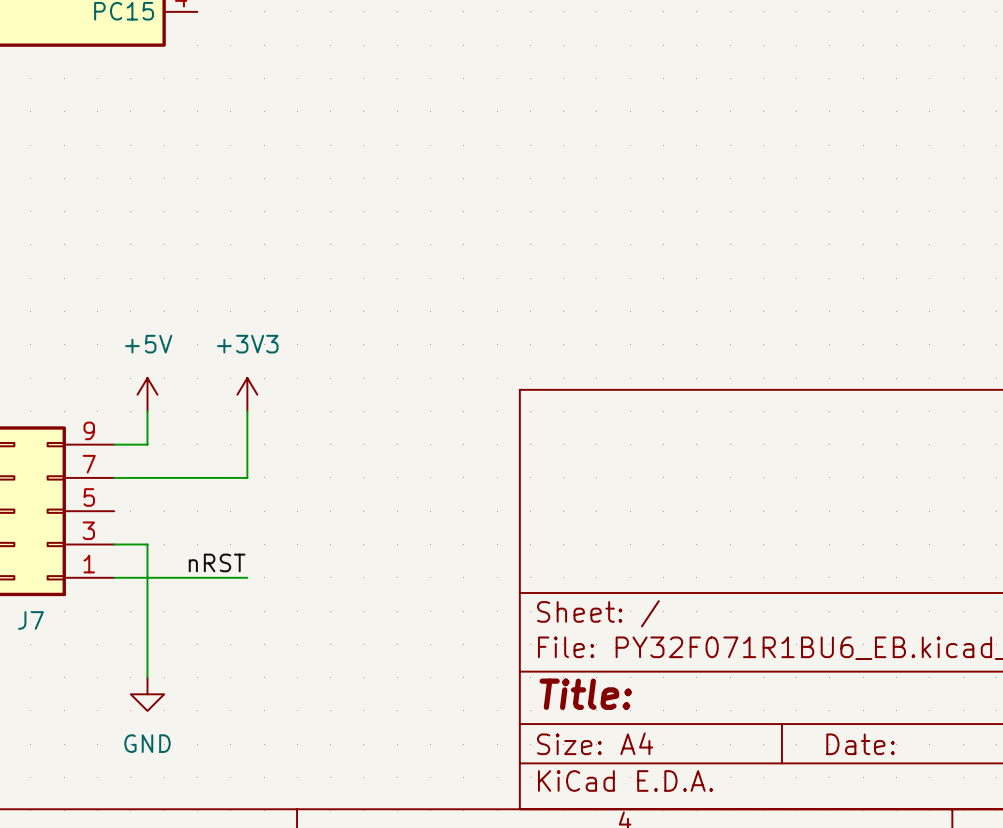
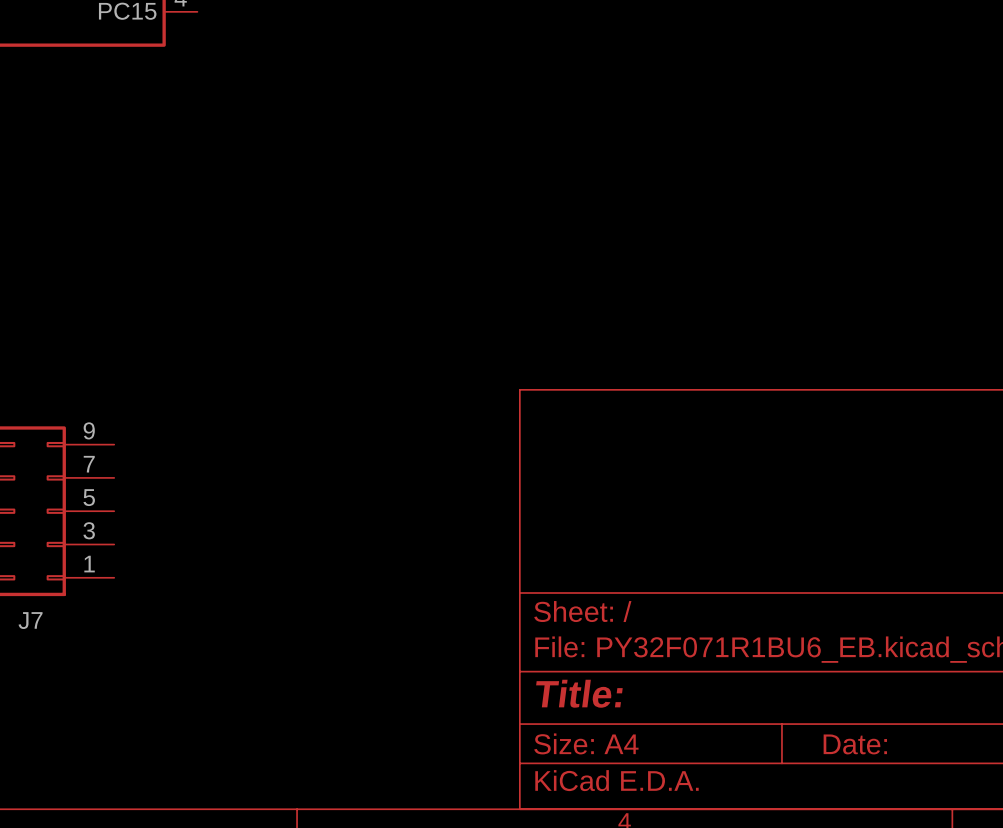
power symbol: +5V (147, 394) -> none
power symbol: +3V3 (247, 394) -> none
wire: (147, 411) (147, 444) (114, 444) -> none
wire: (247, 411) (247, 477) (114, 477) -> none
wire: (114, 544) (147, 544) (147, 677) -> none
label: nRST (217, 562) -> none
wire: (114, 577) (247, 577) -> none
power symbol: GND (147, 694) -> none

